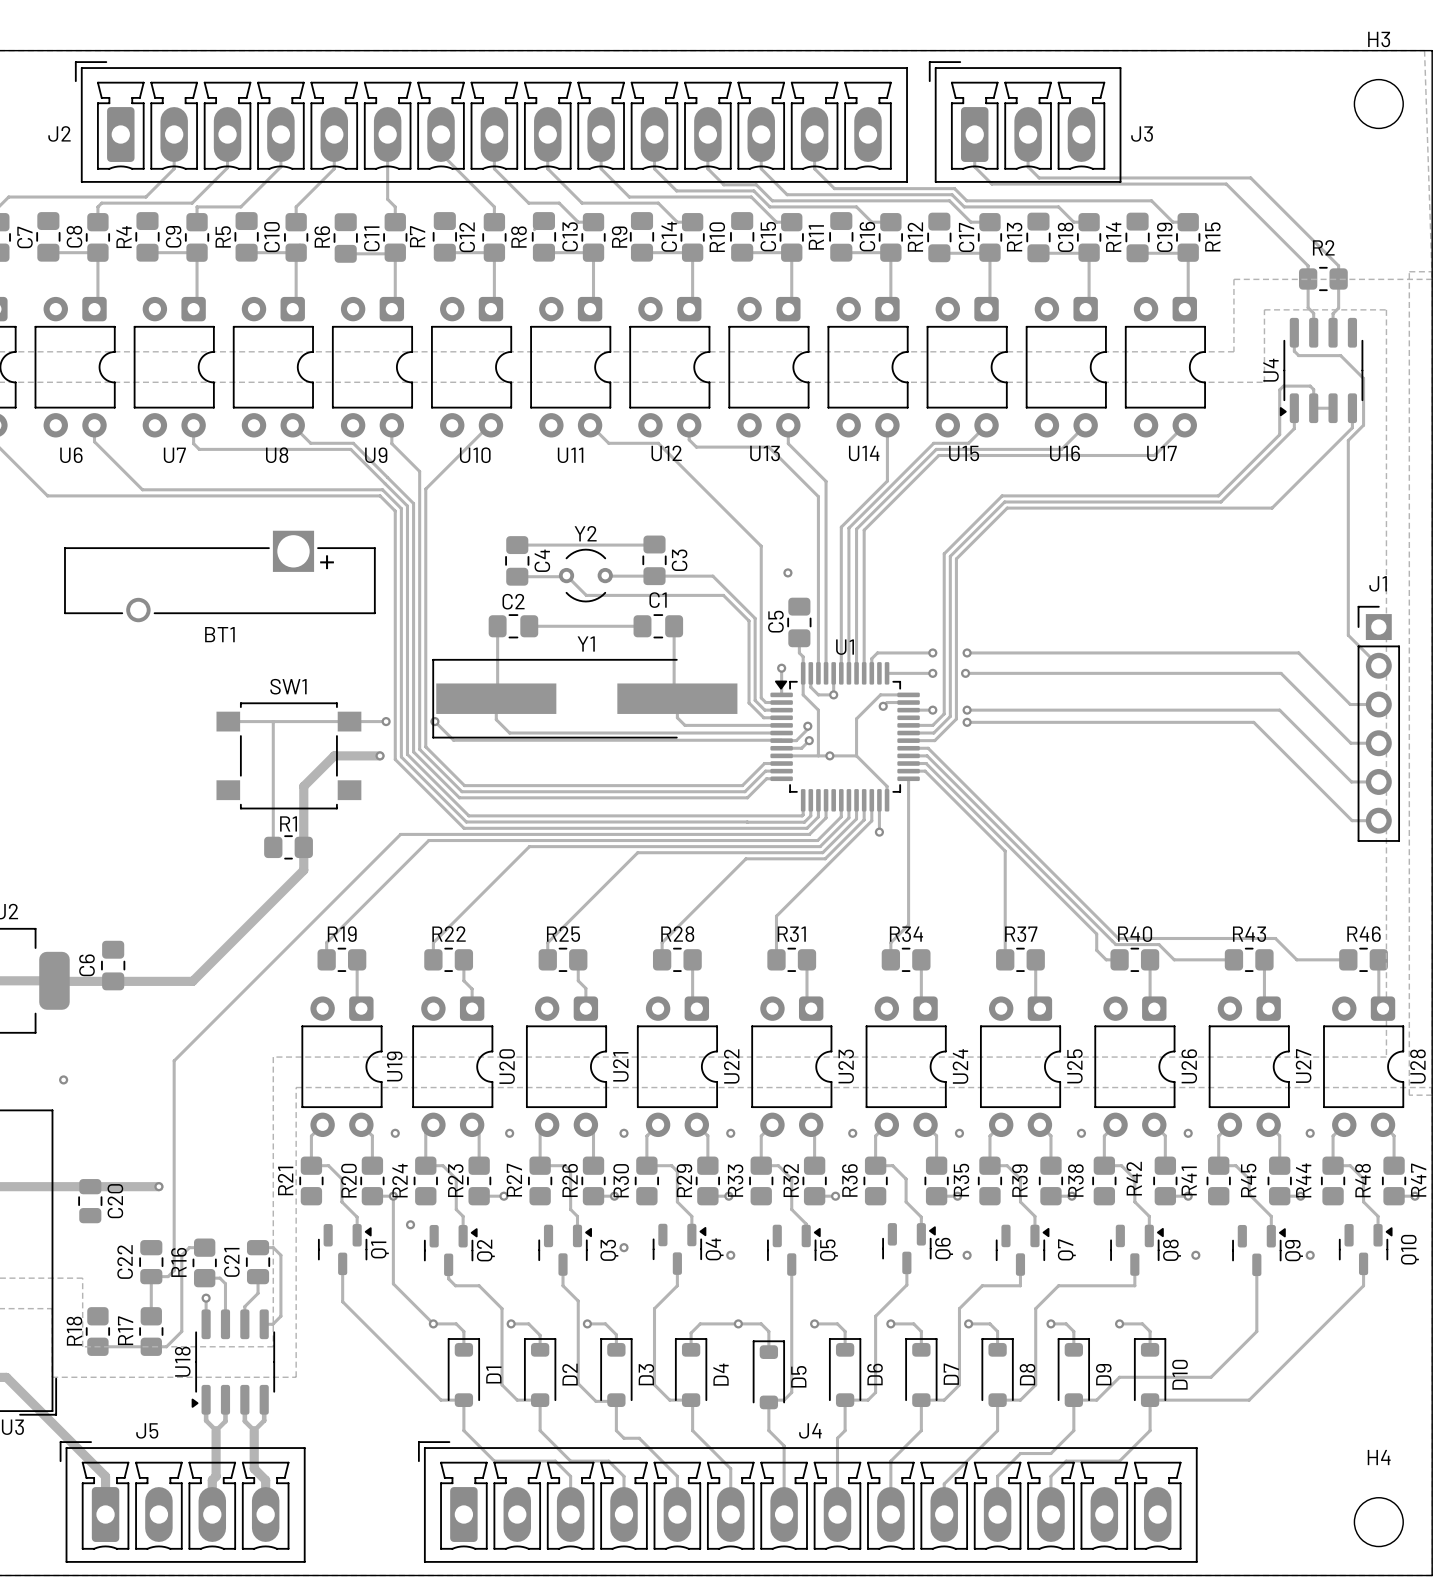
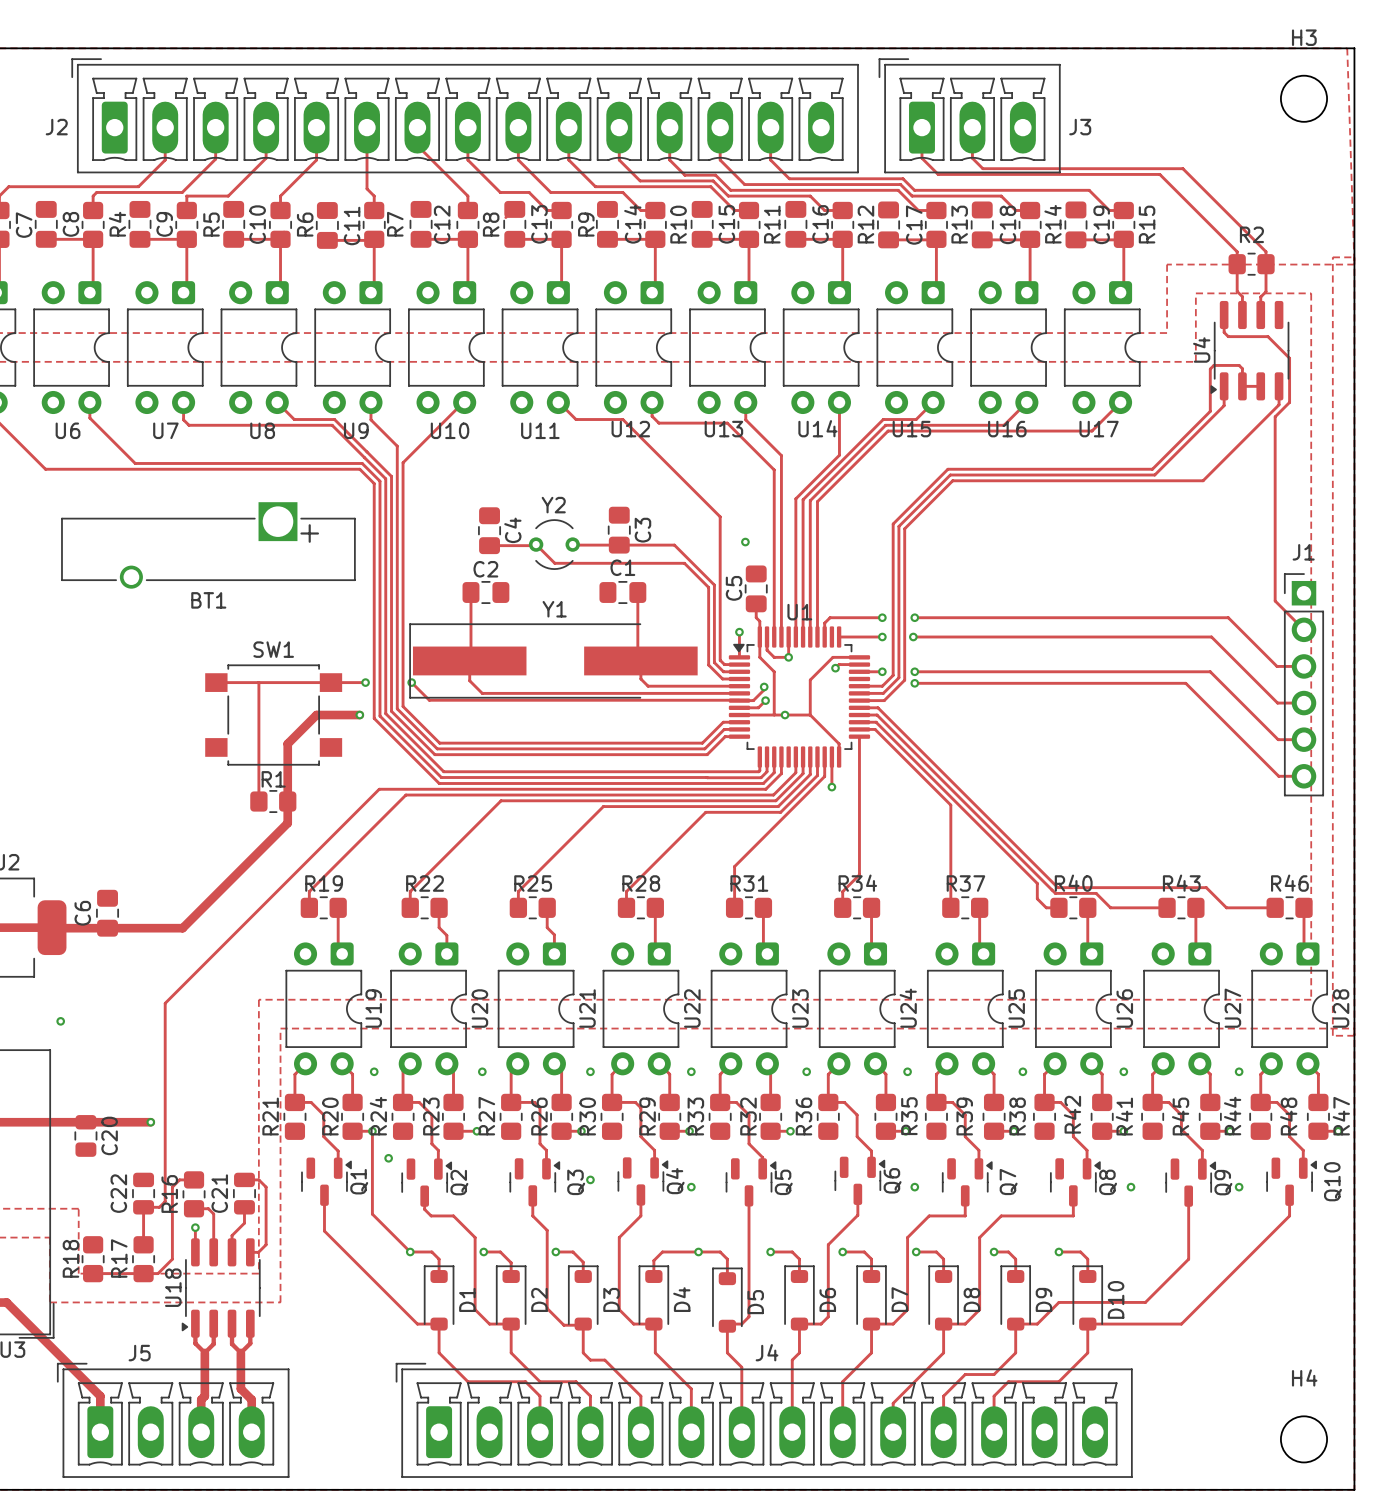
track: (517, 545) (653, 545) -> none
track: (529, 626) (642, 626) -> none

